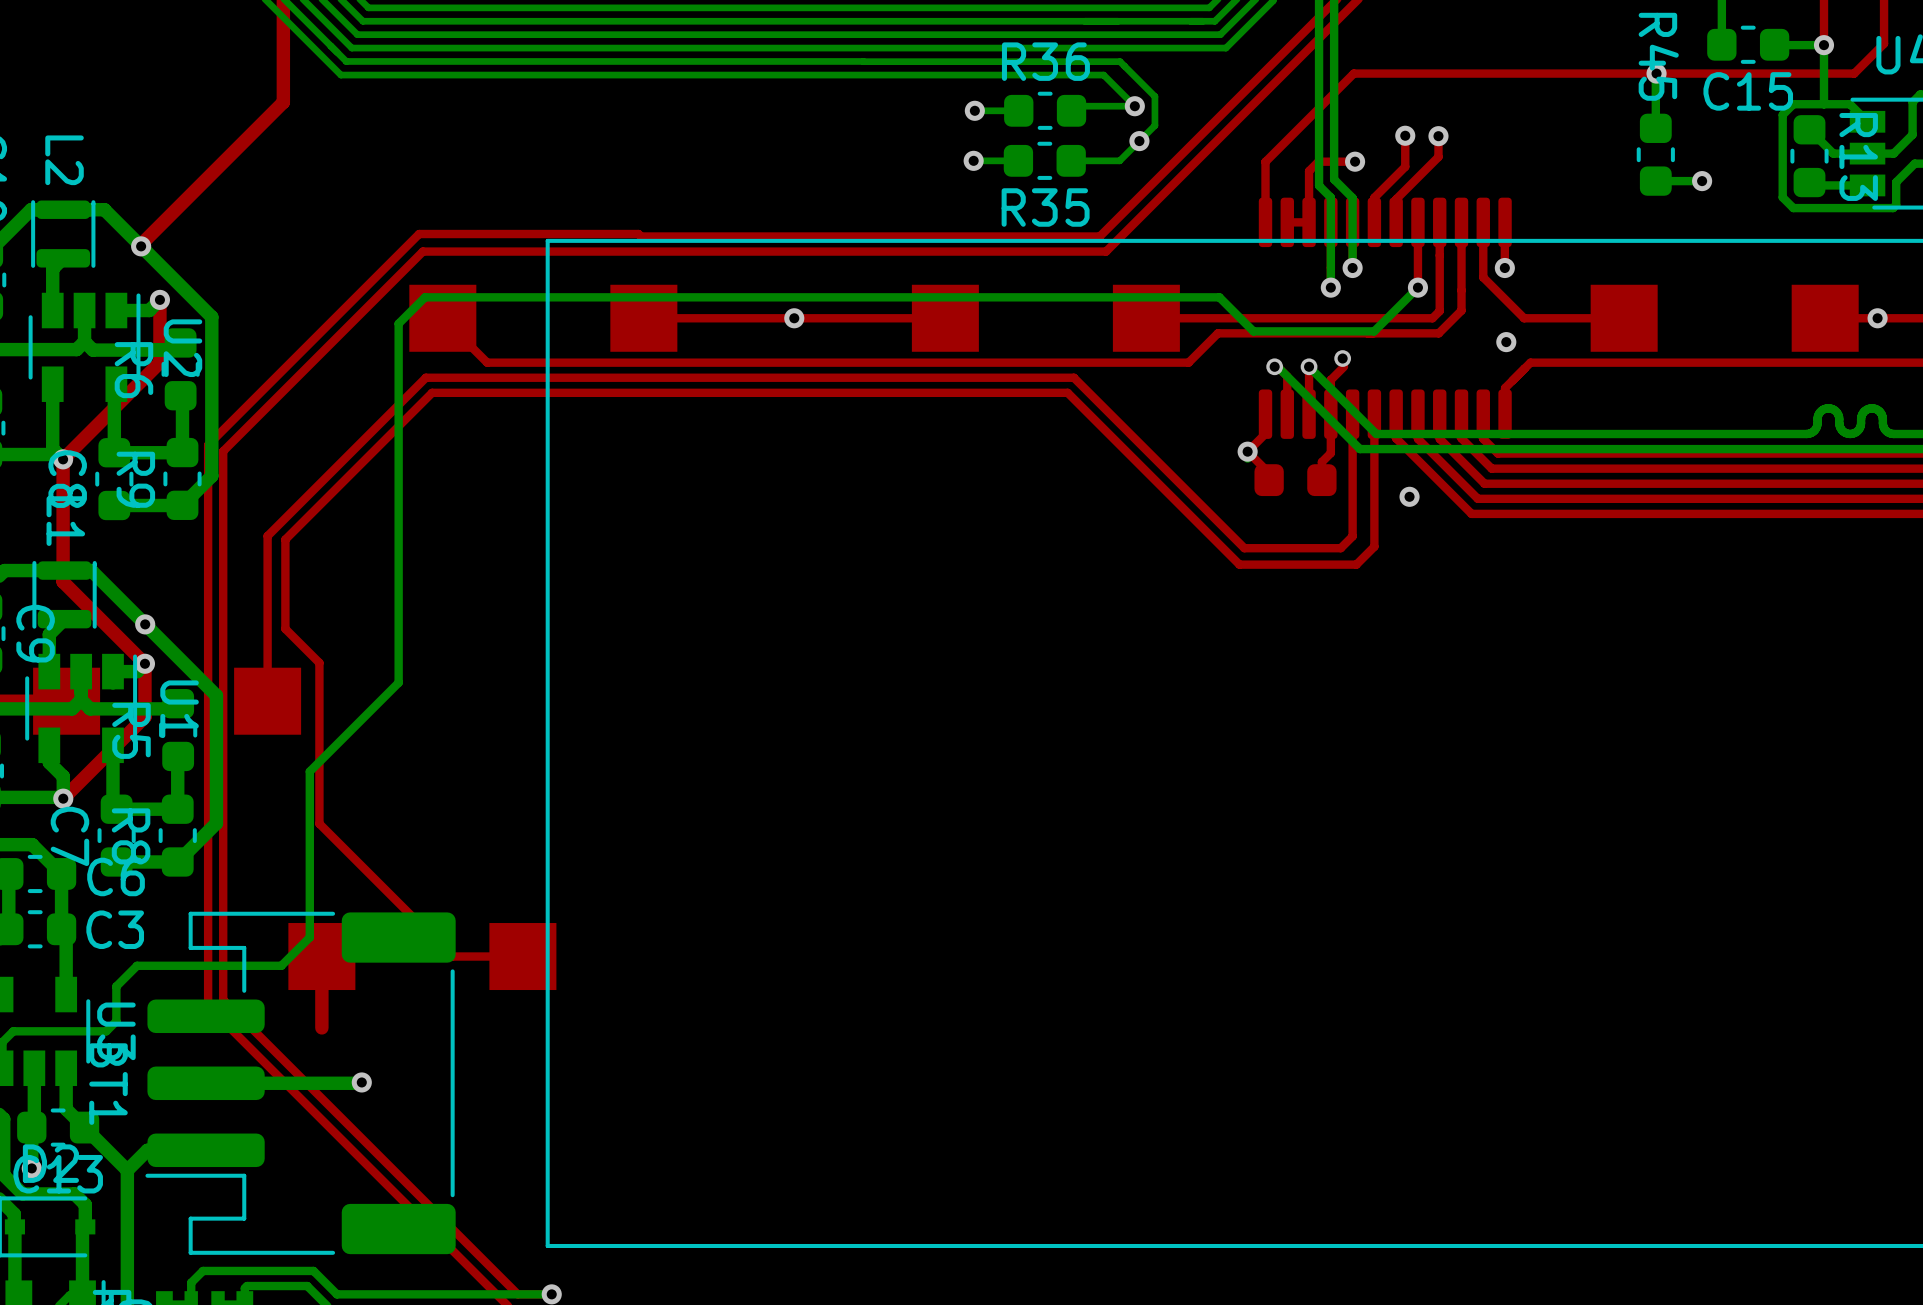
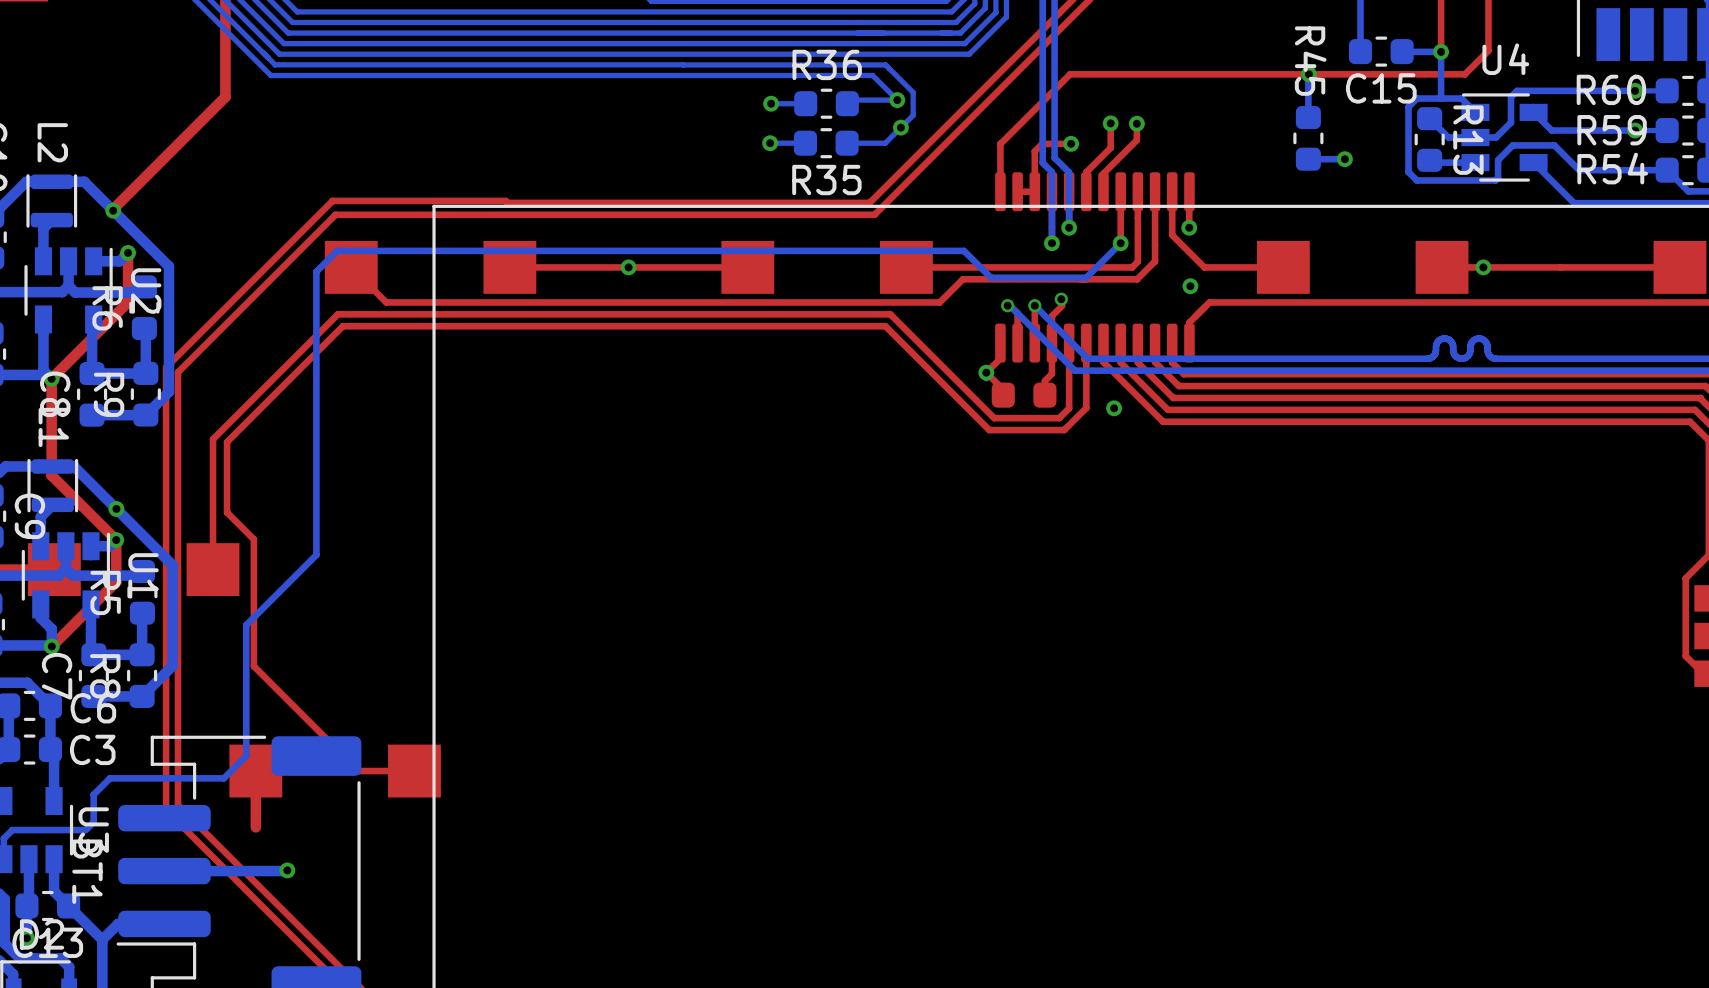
top track: (1073, 377) (1244, 548) (1340, 548) (1352, 536) (1352, 496) -> (849, 314) (890, 314) (994, 418) (1059, 418) (1069, 408)
top track: (1067, 392) (1239, 564) (1356, 564) (1374, 546) (1374, 496) -> (844, 326) (885, 326) (989, 430) (1064, 430) (1086, 407)

